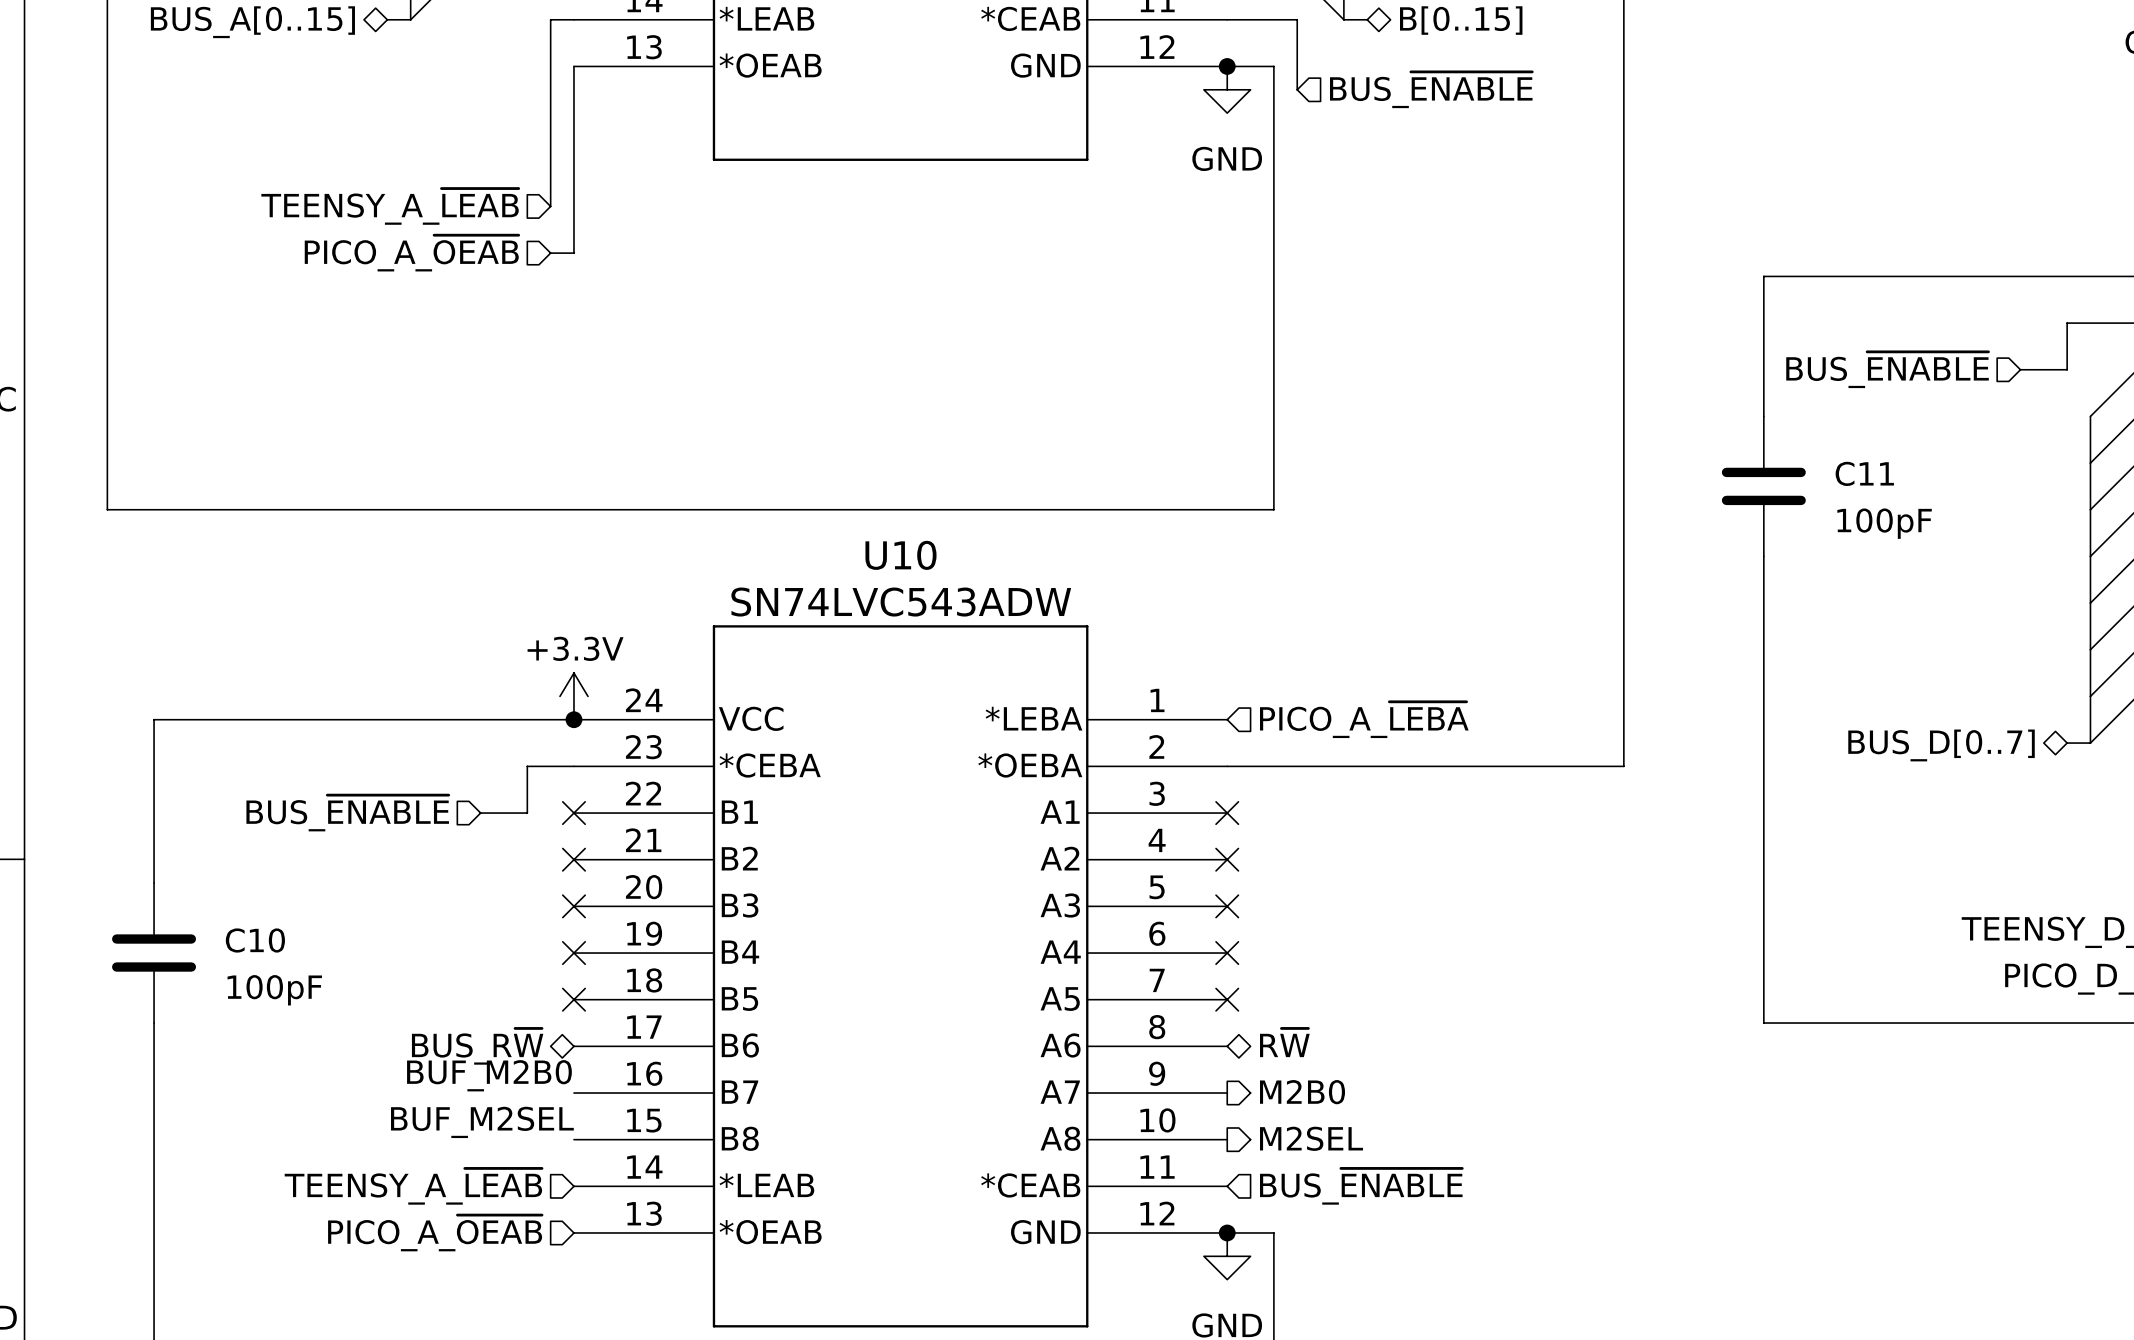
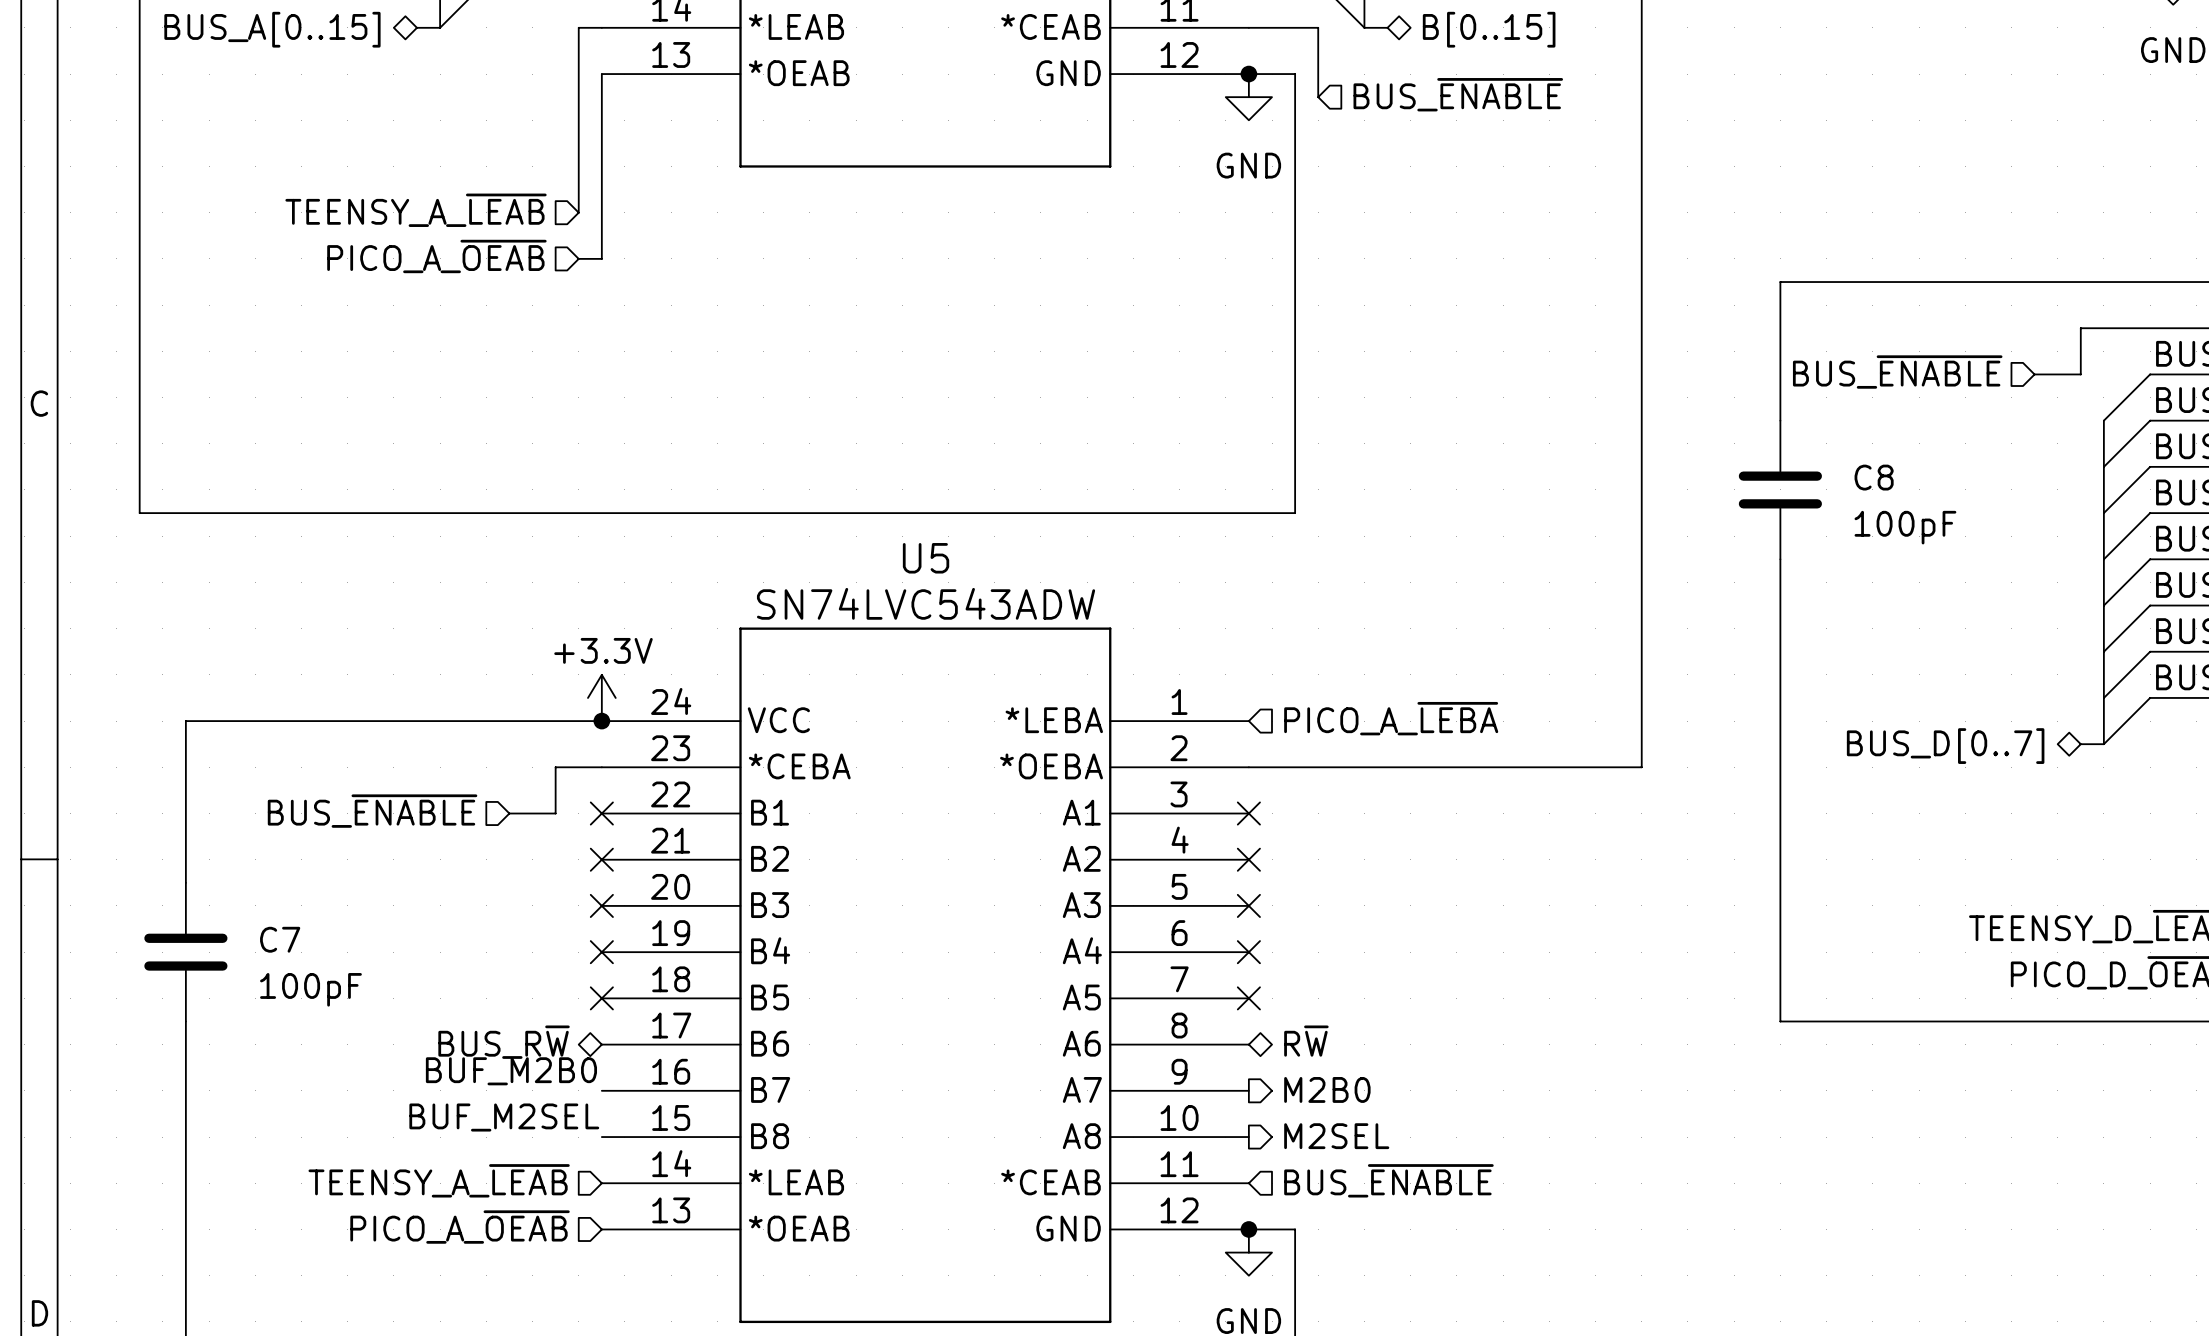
C11 name: C11 (1864, 473) -> C8 (1874, 477)
U10 name: U10 (901, 555) -> U5 (926, 558)
C10 name: C10 (255, 940) -> C7 (280, 939)

